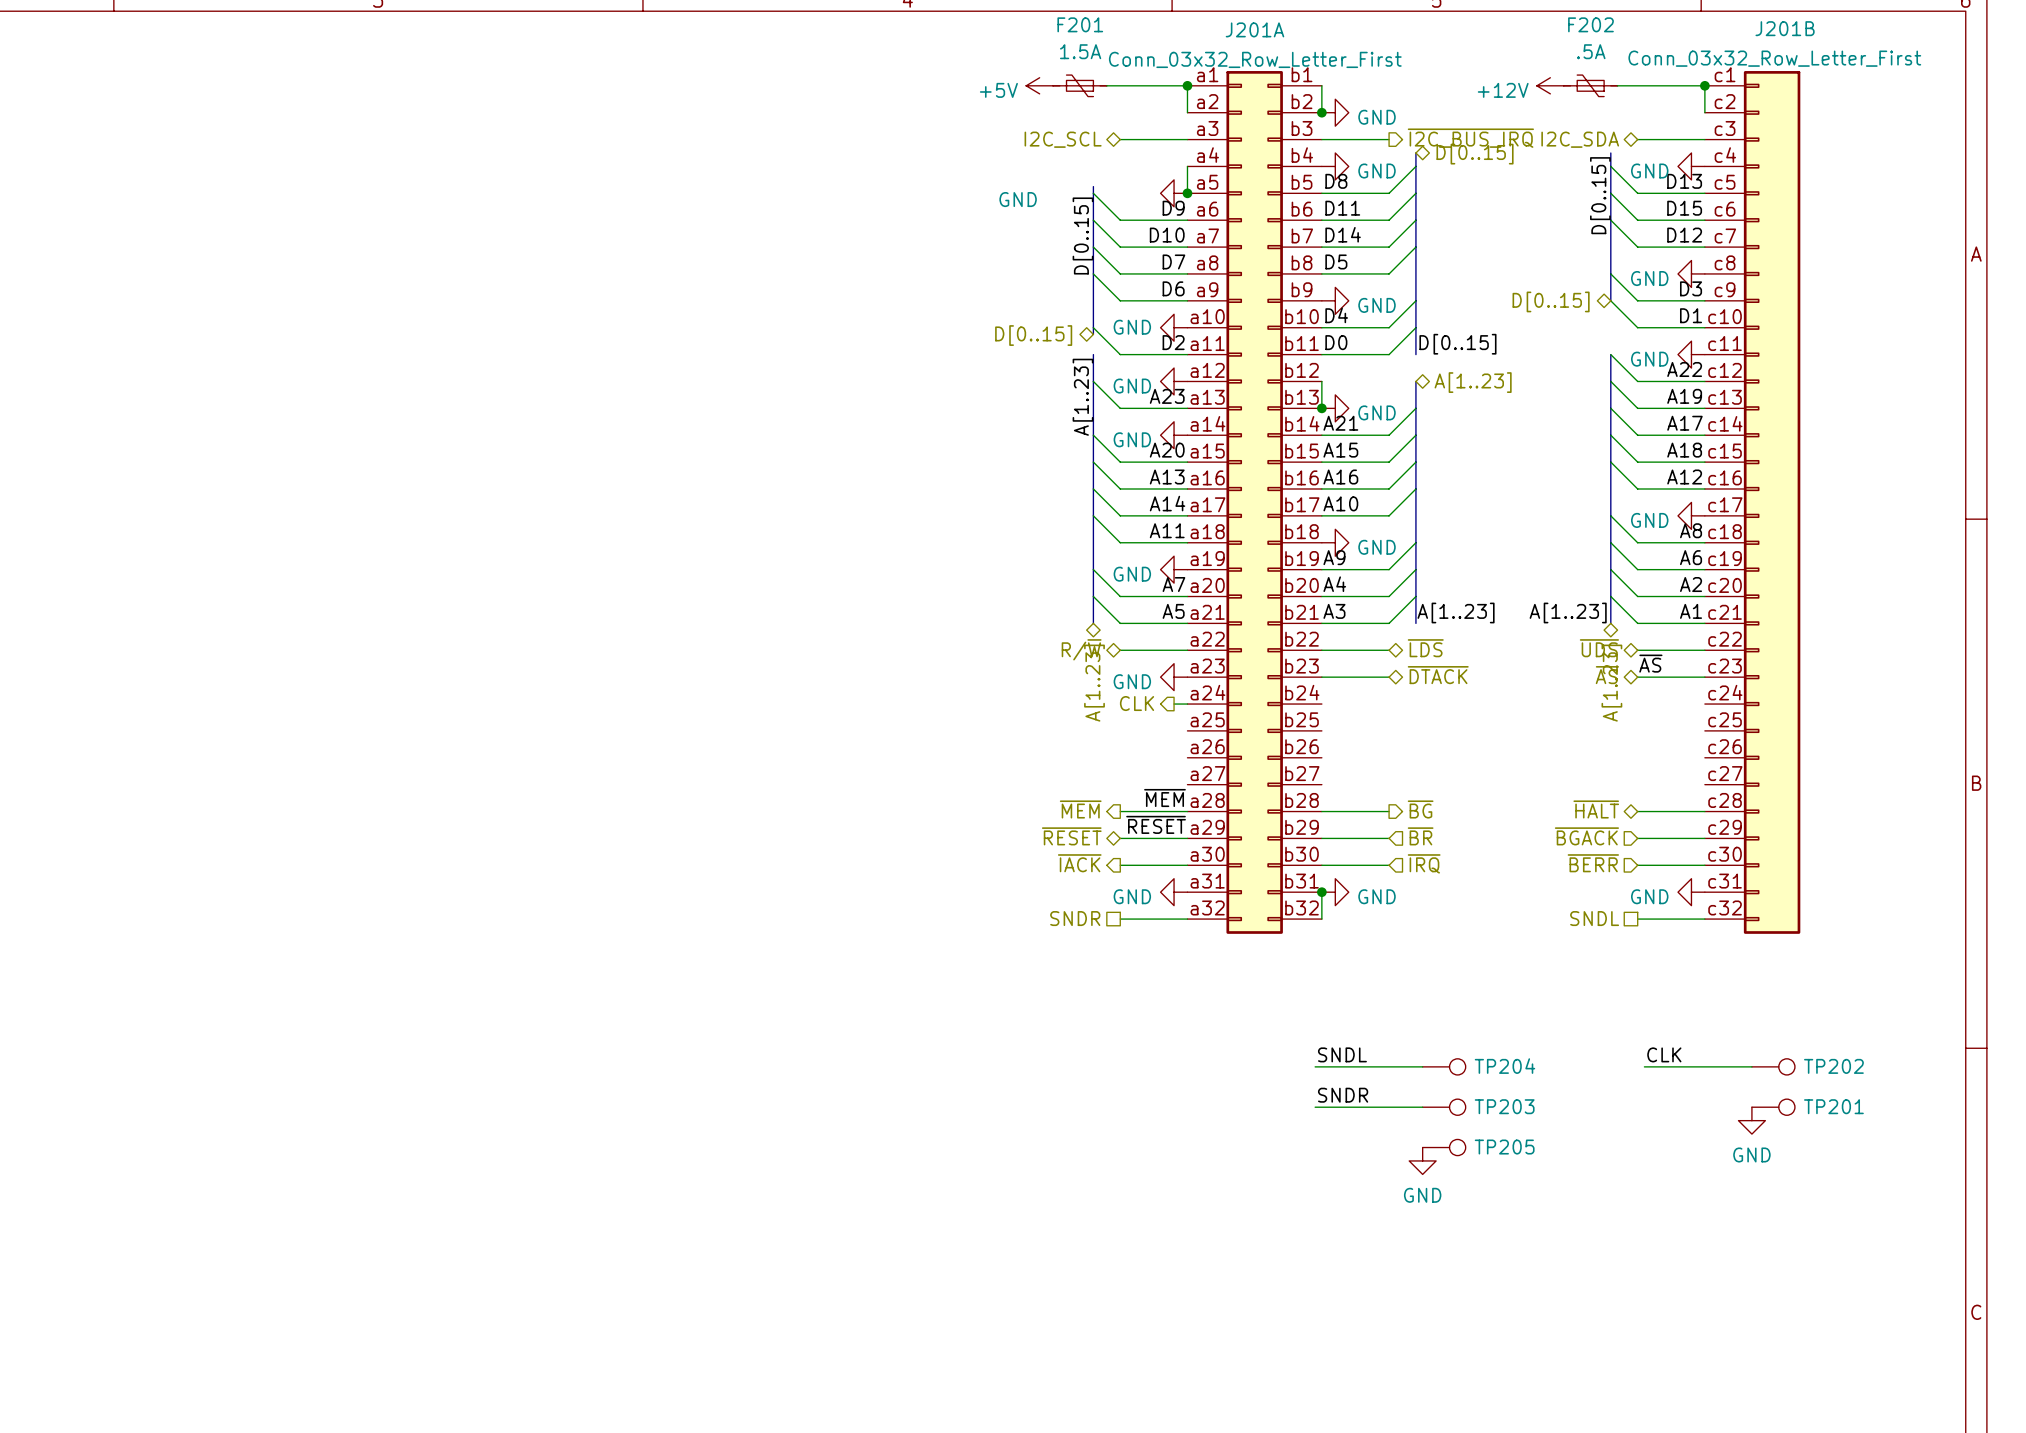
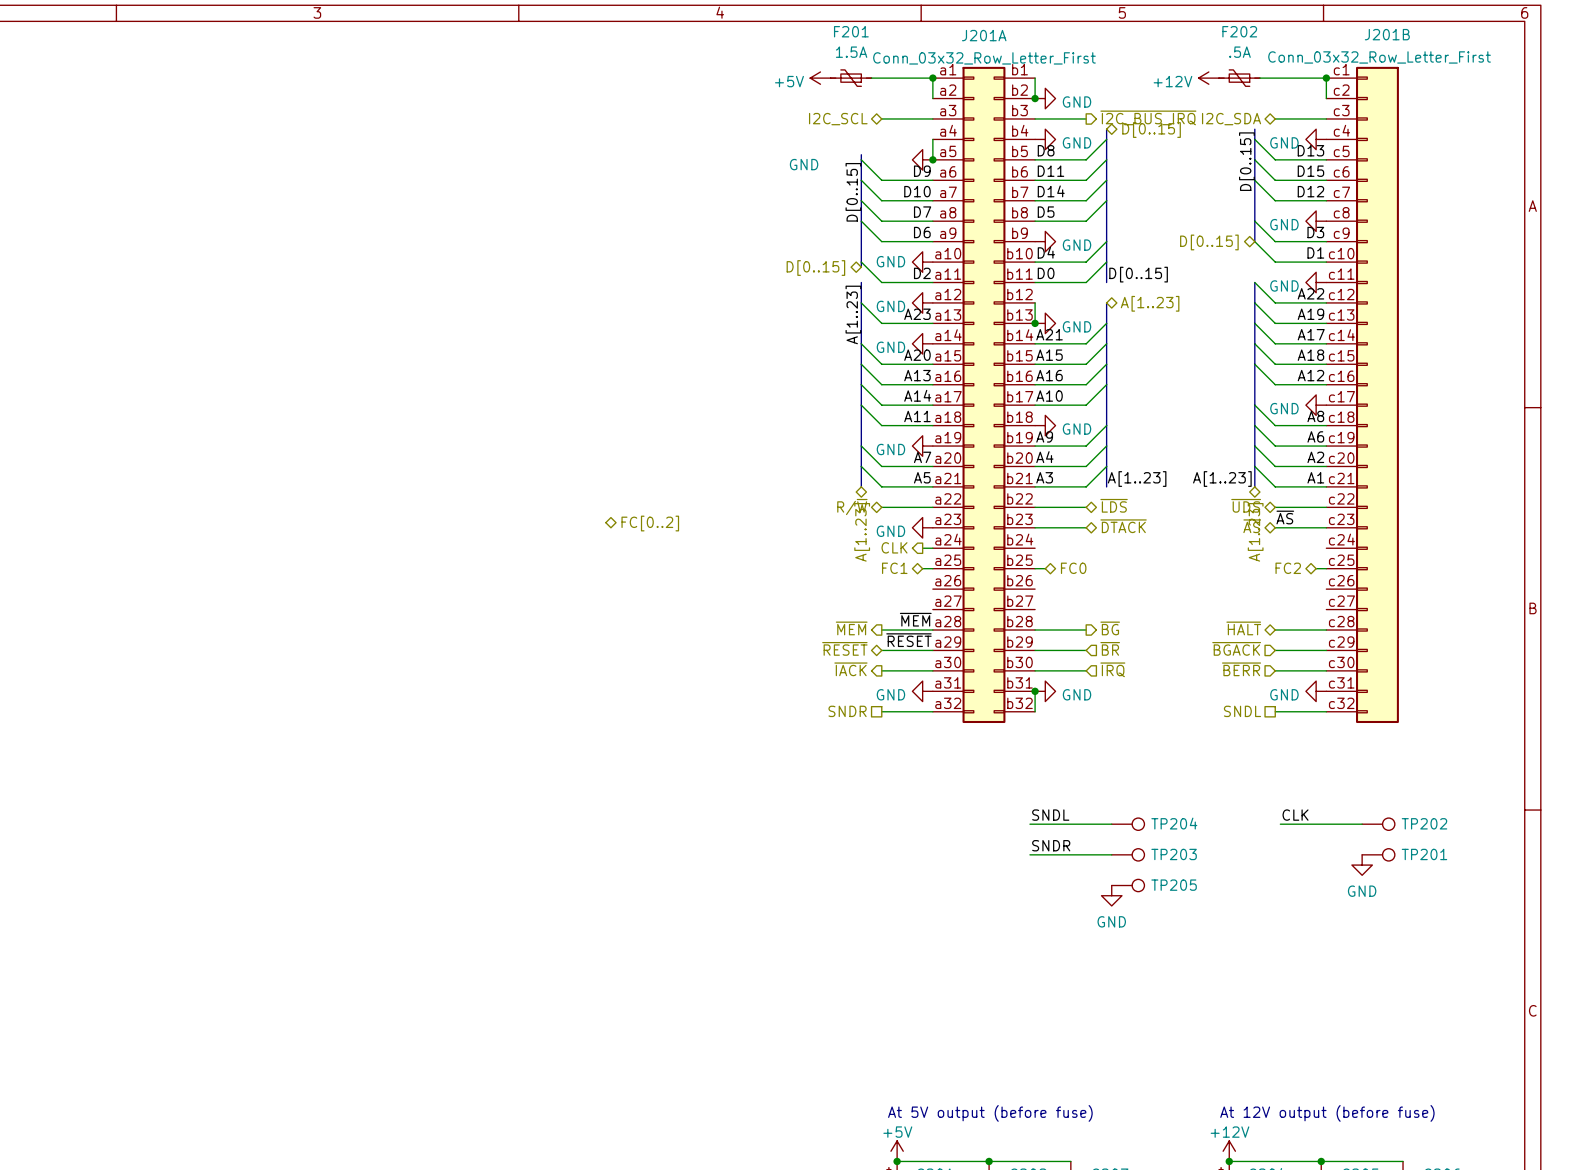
hierarchical label: none -> FC[0..2] (650, 523)
hierarchical label: none -> FC1 (894, 568)
wire: none -> (922, 568) (932, 568)
wire: none -> (1035, 568) (1045, 568)
hierarchical label: none -> FC0 (1073, 568)
hierarchical label: none -> FC2 (1288, 568)
wire: none -> (1316, 568) (1326, 568)

